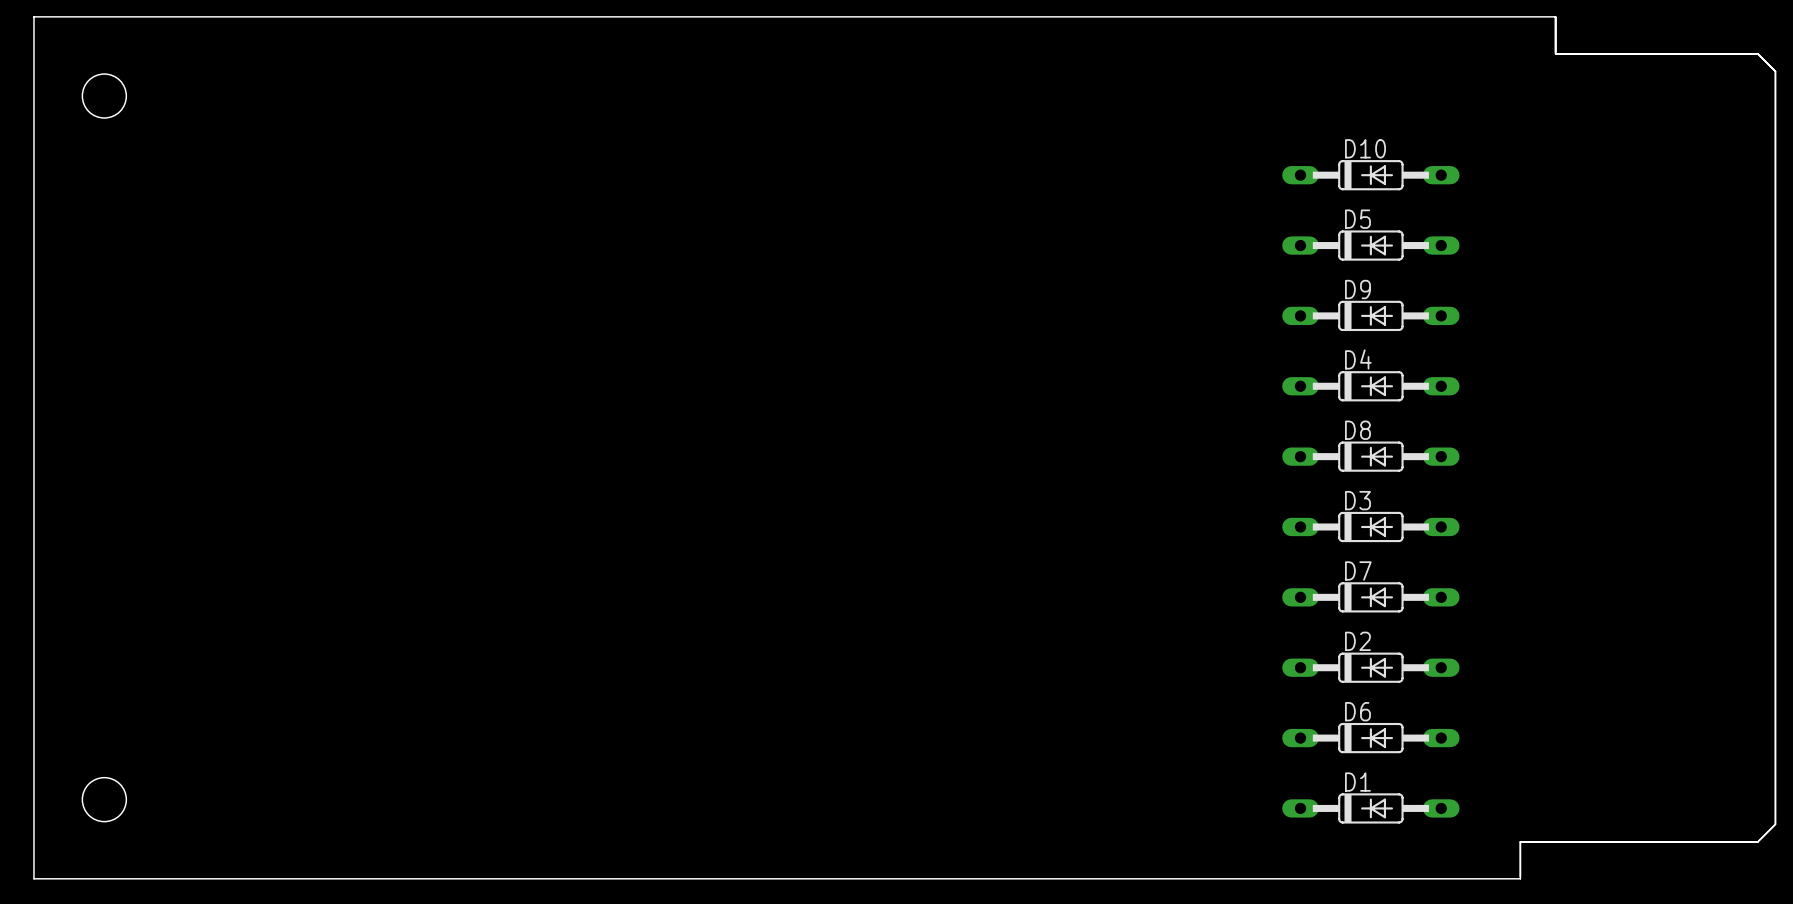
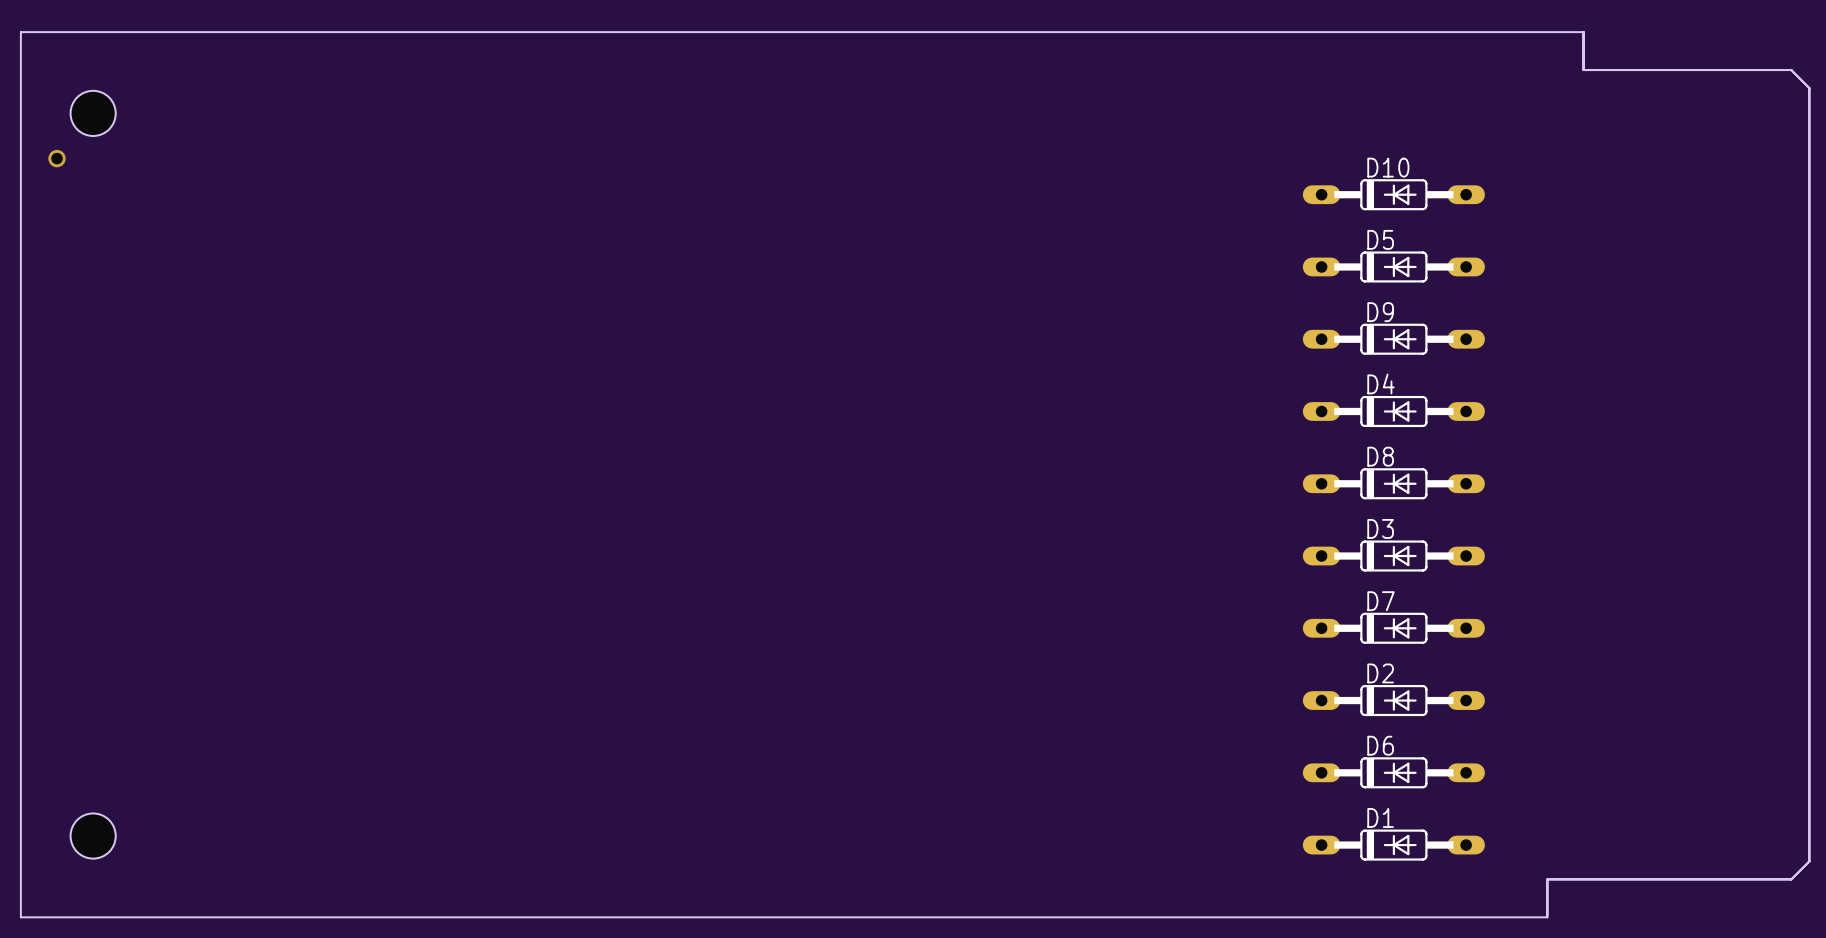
via: none -> (57, 158)

